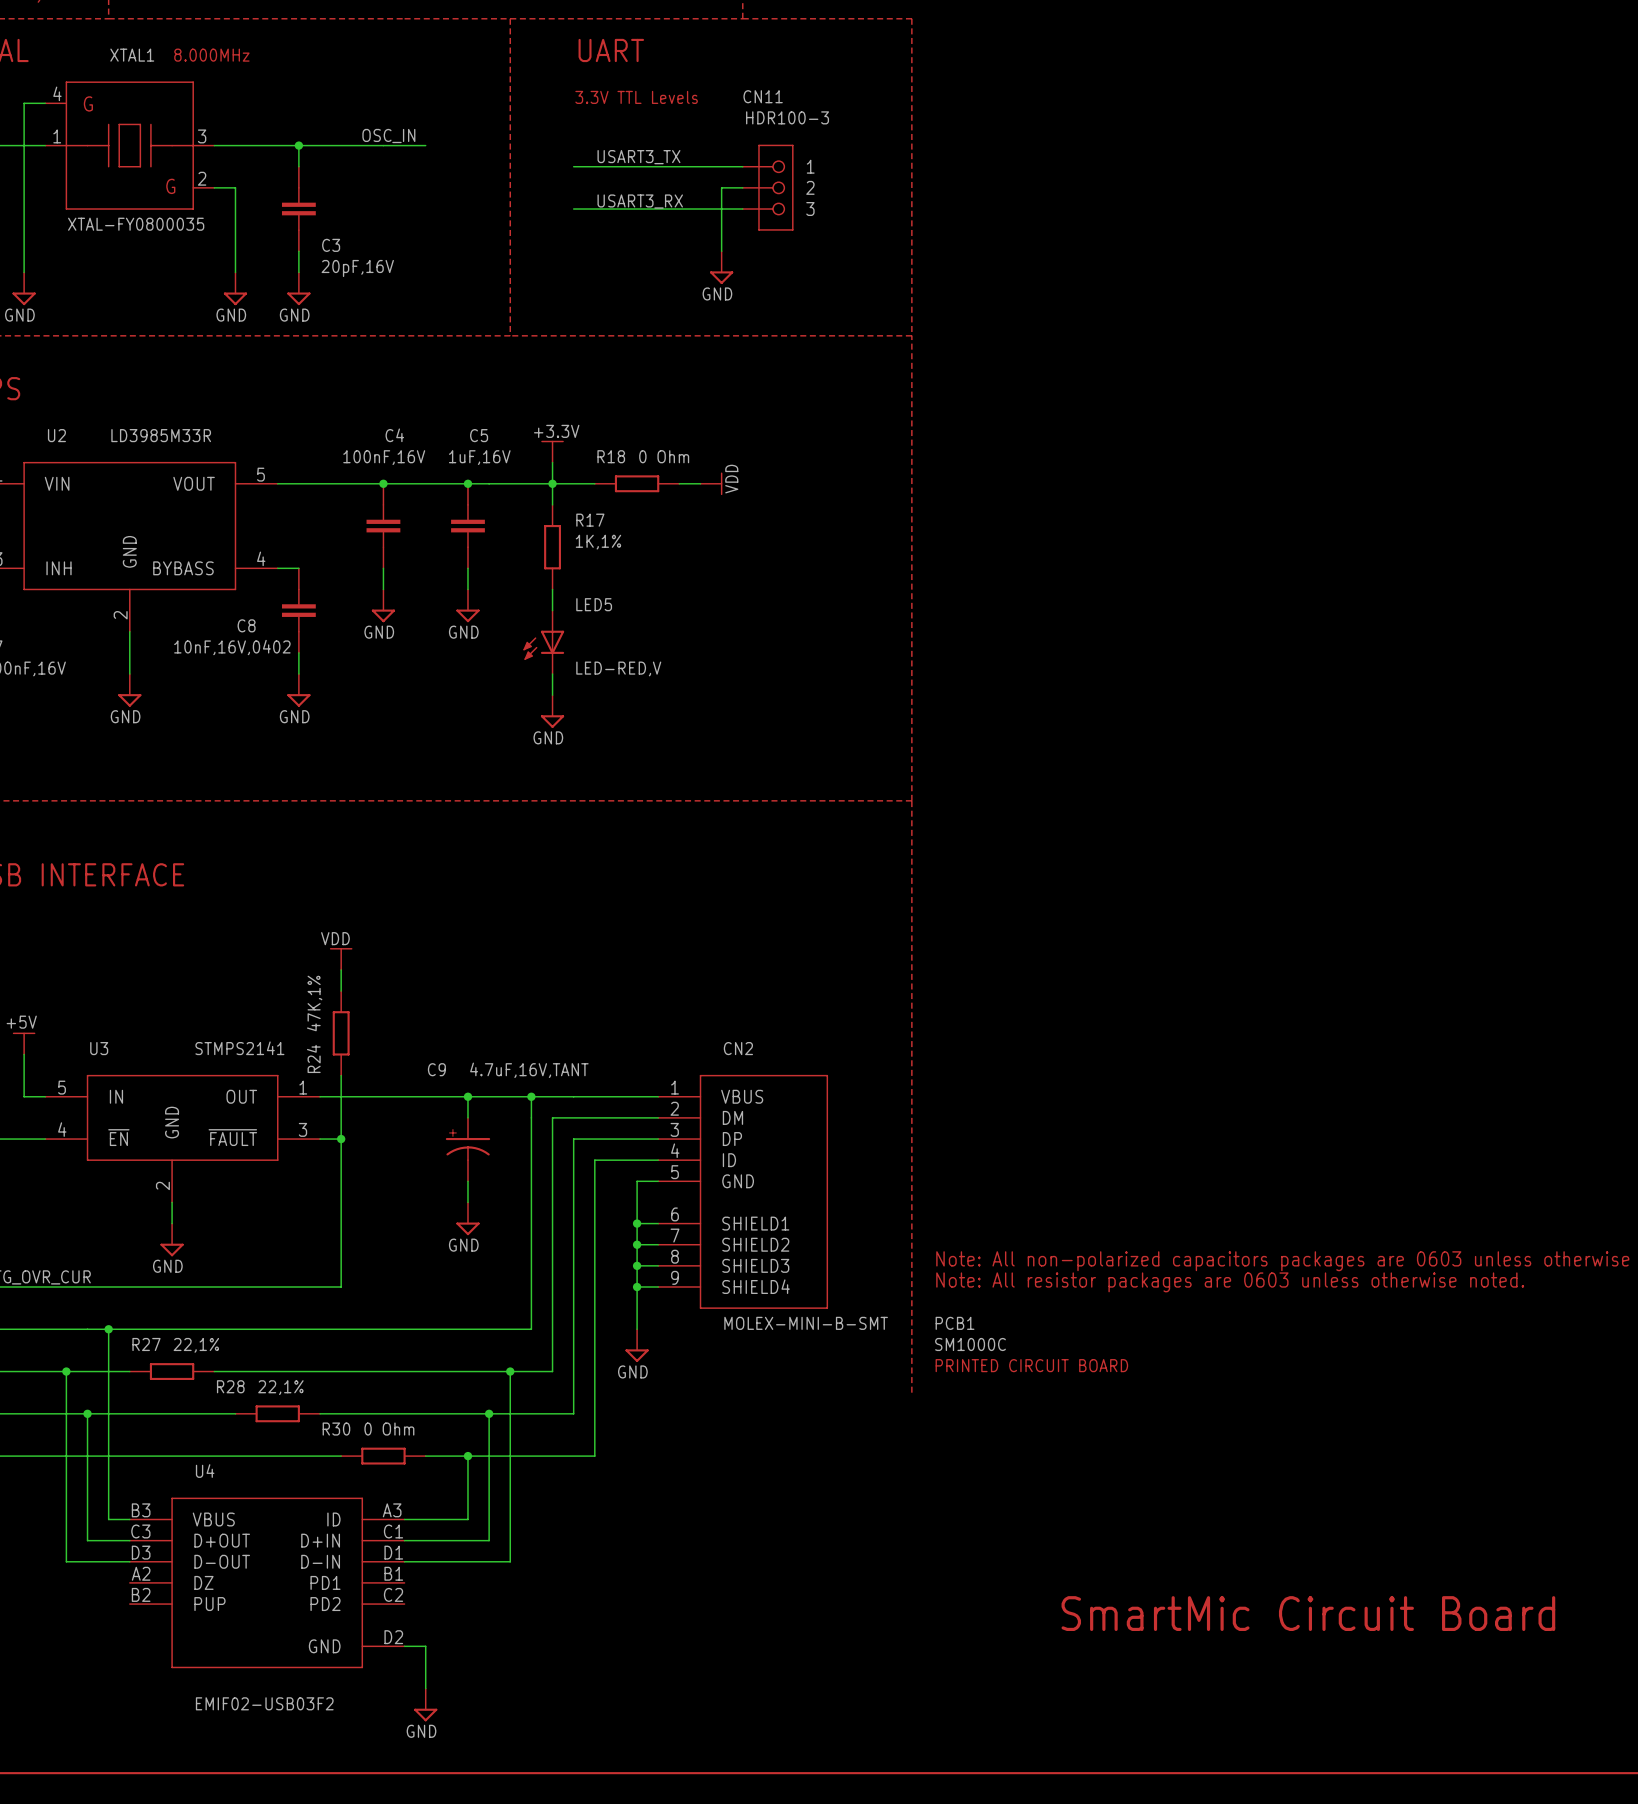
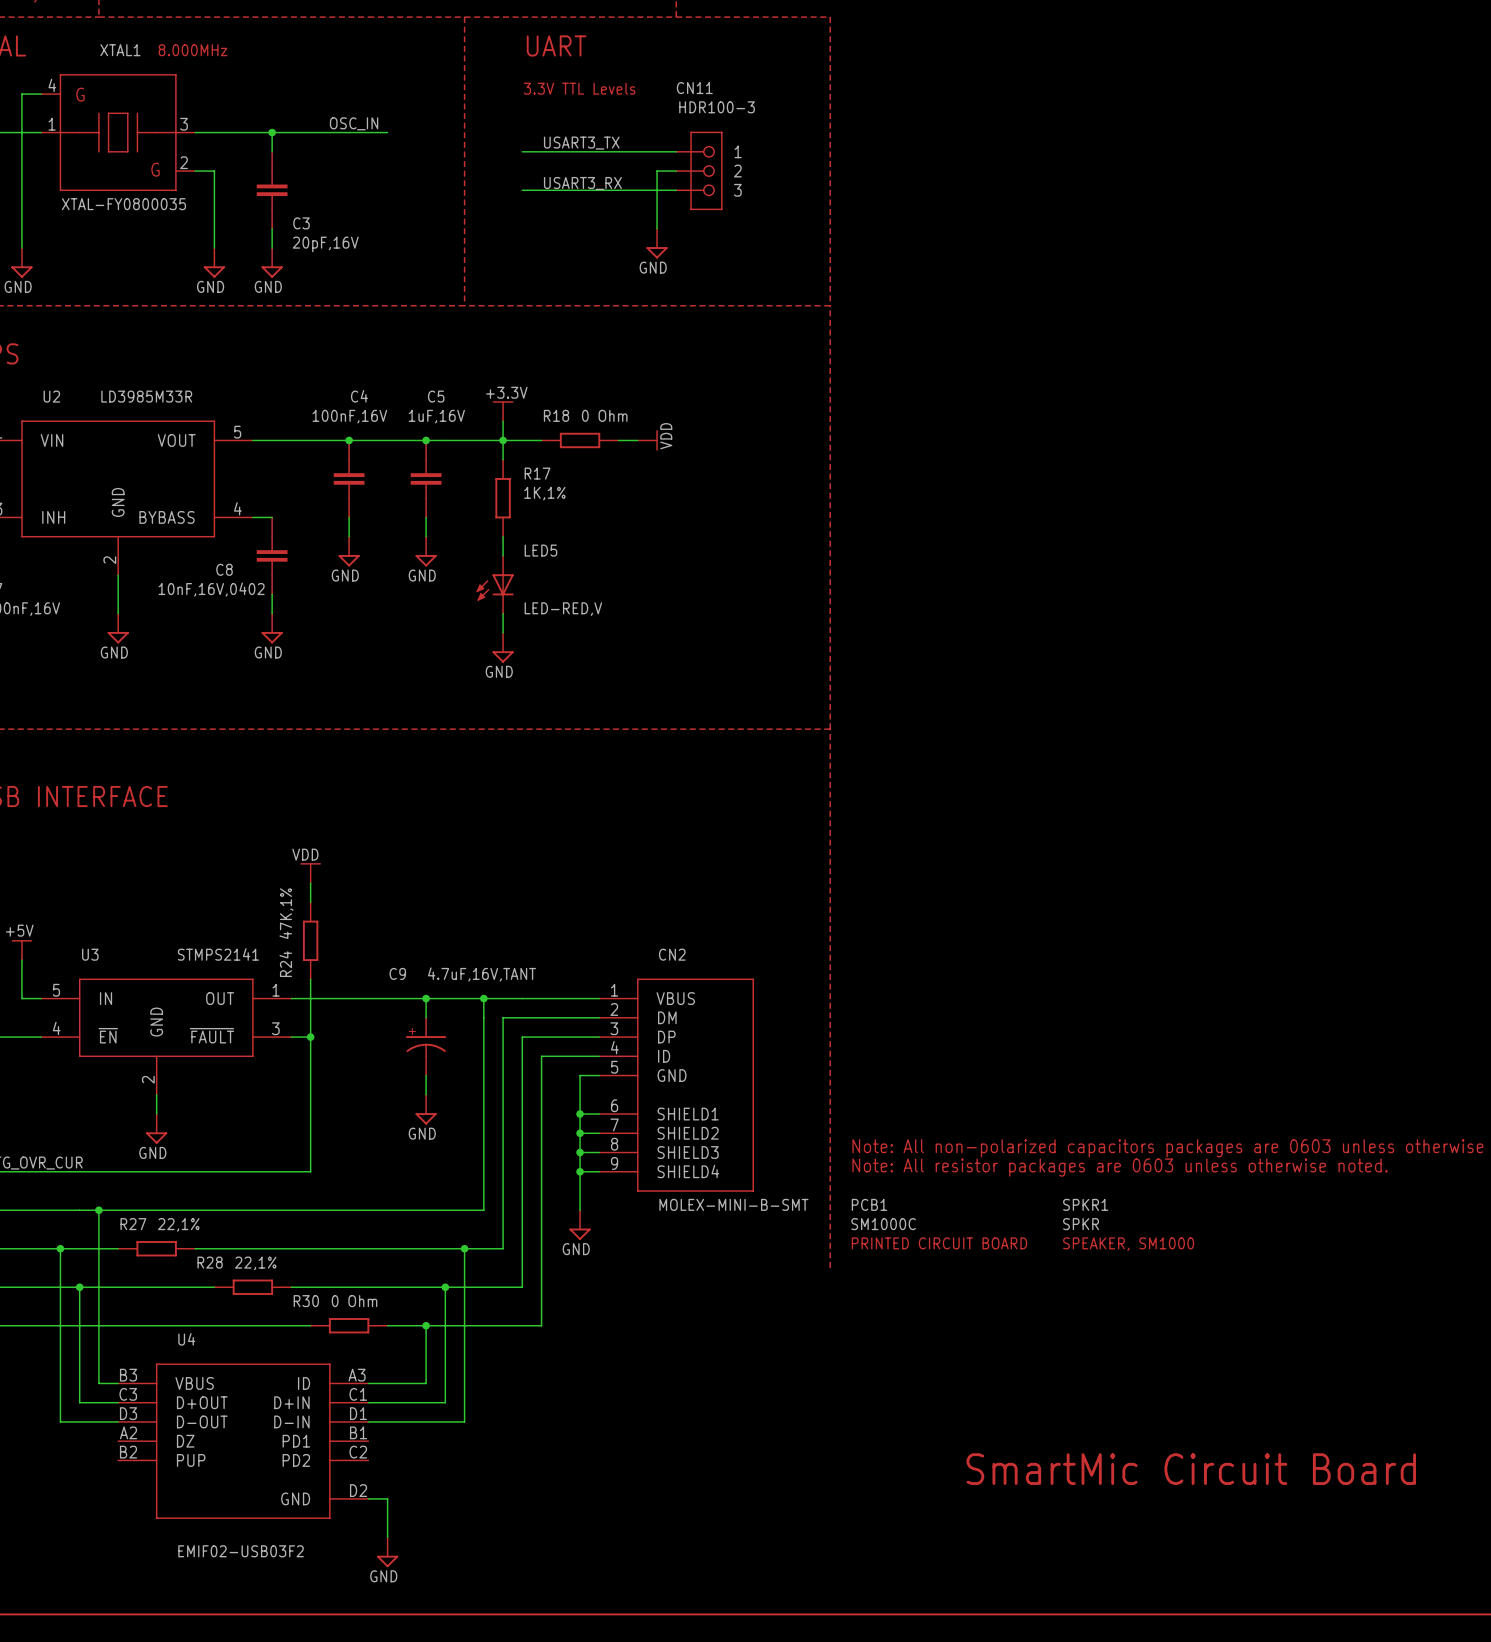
SPKR1: none -> SPKR (1128, 1224)

